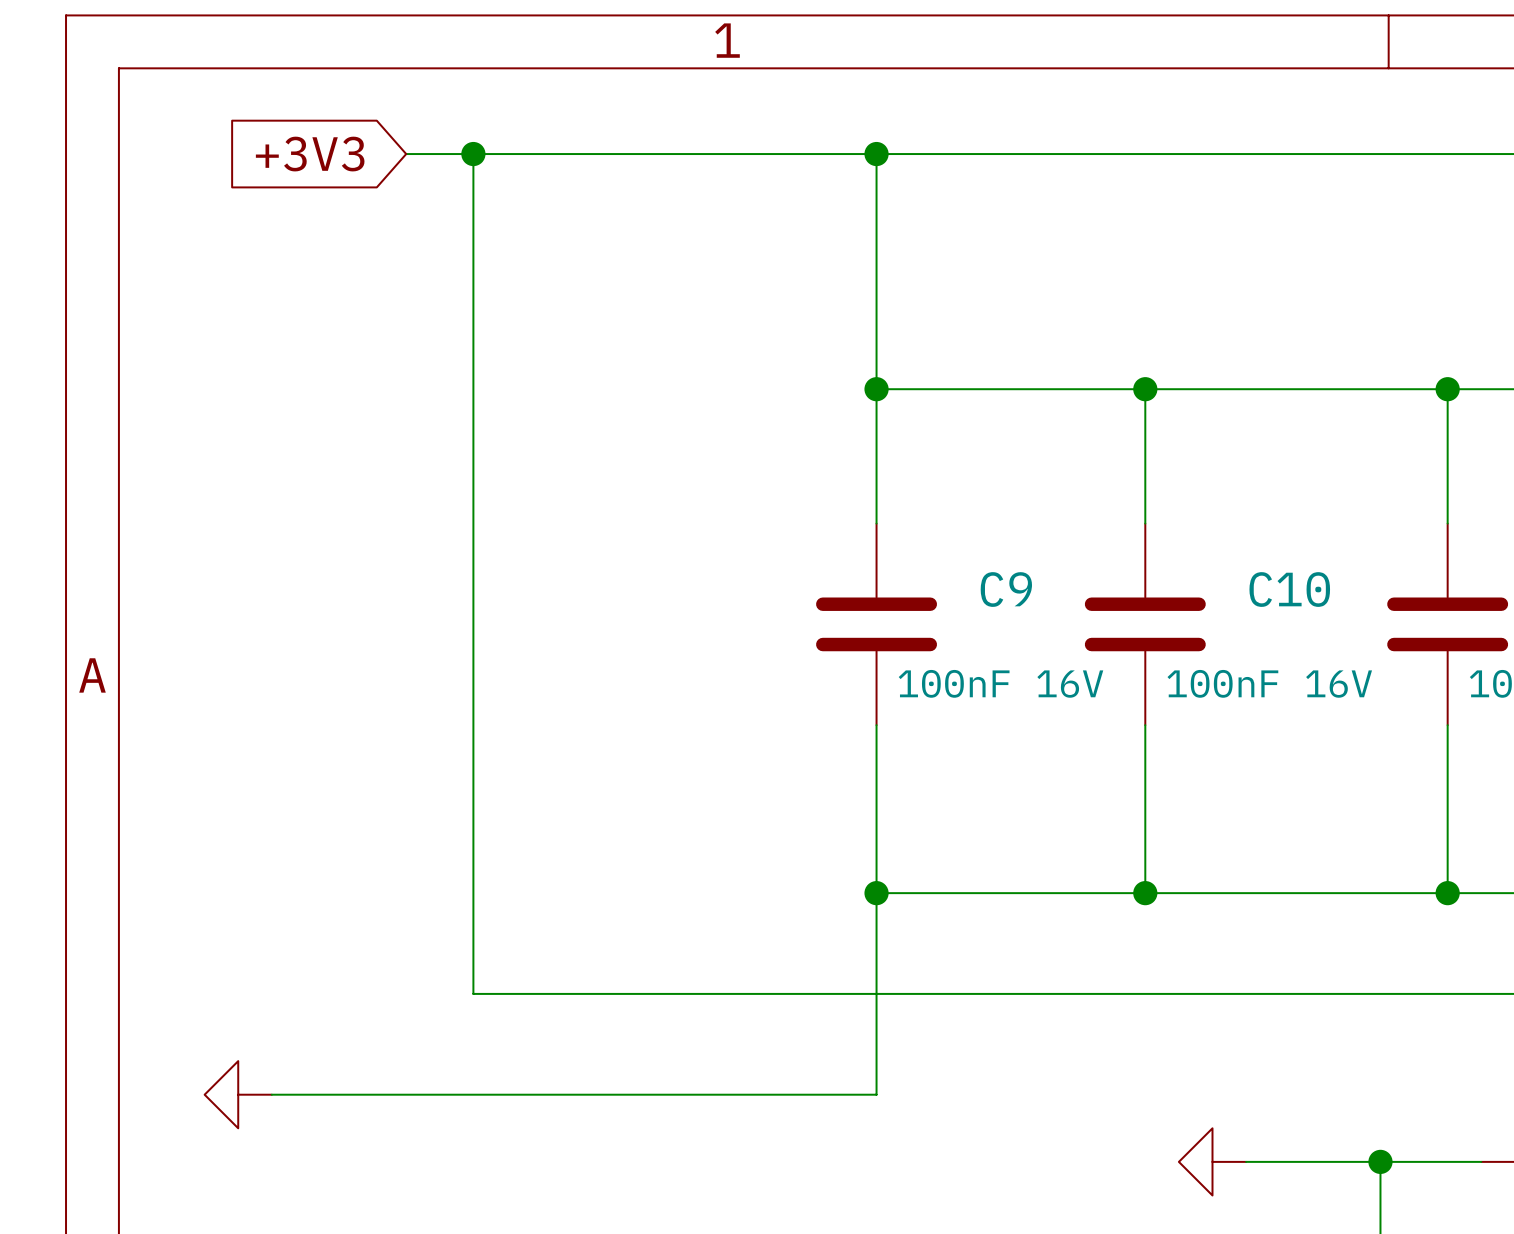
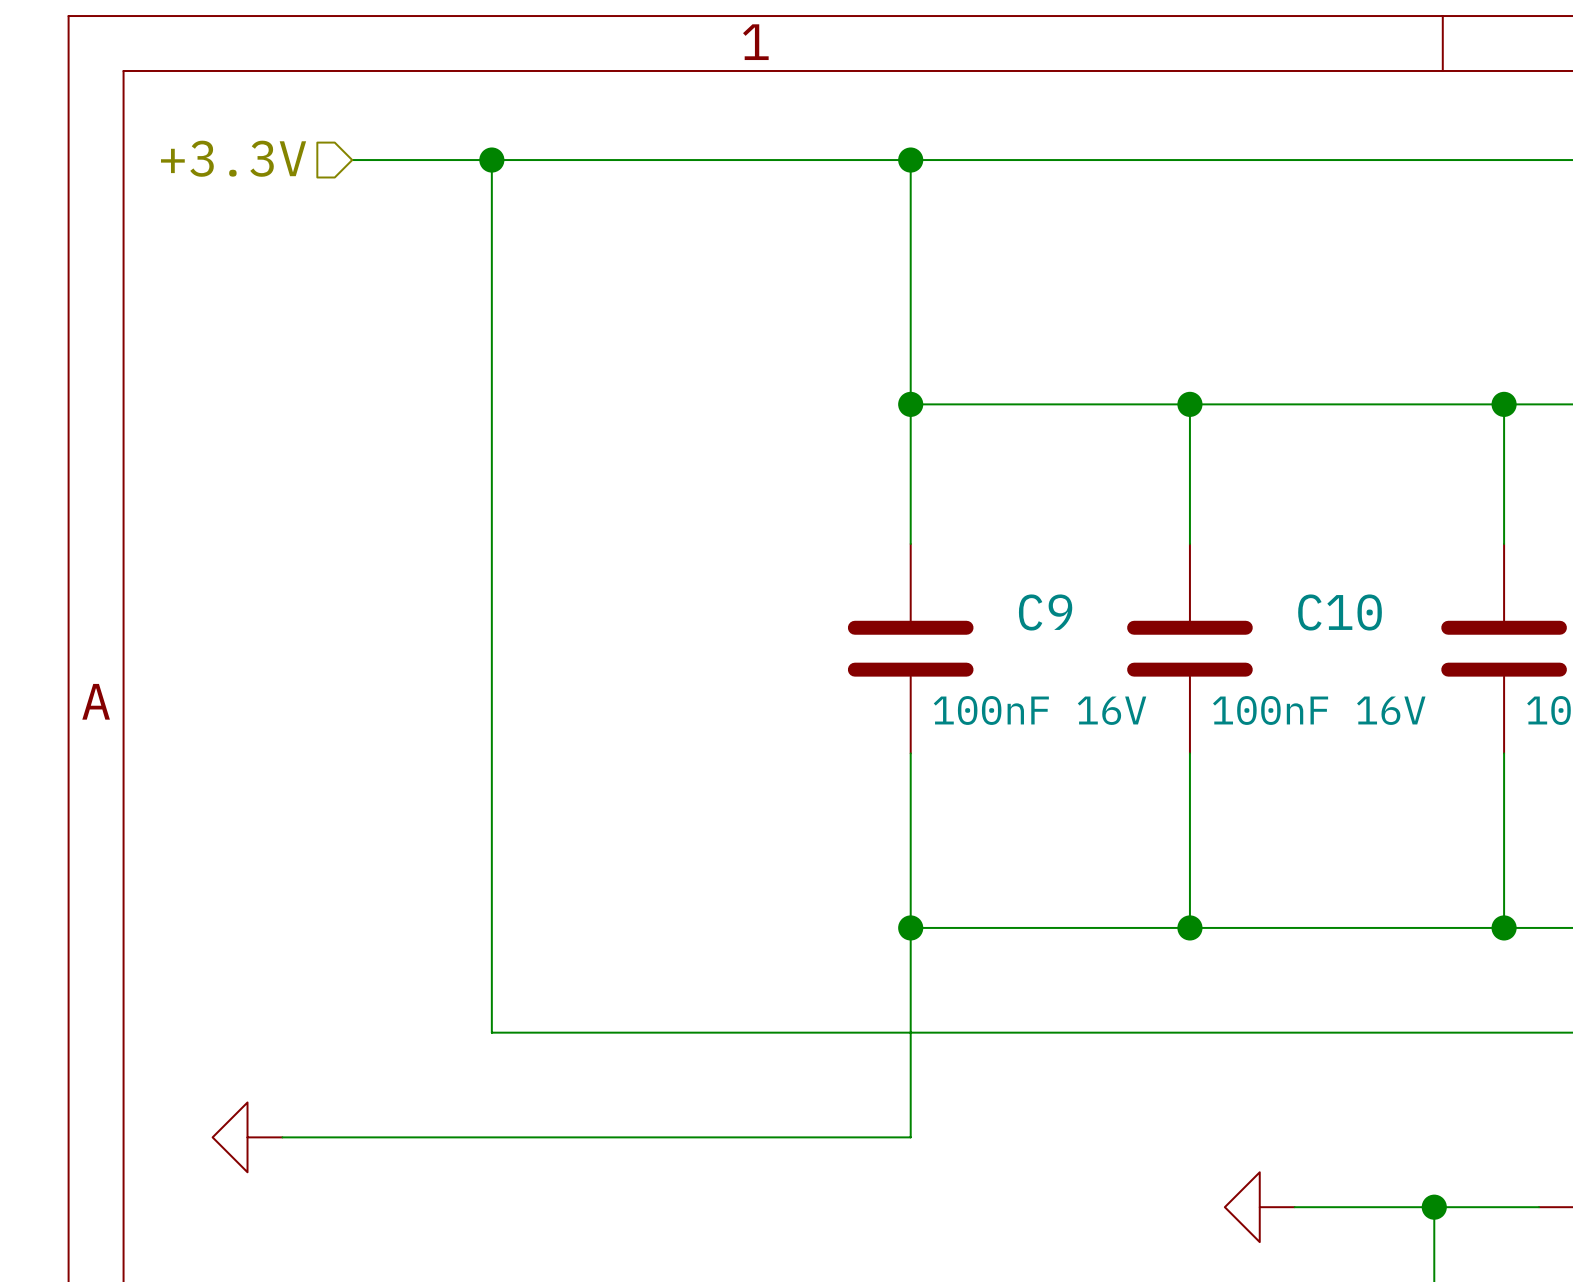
hierarchical label: none -> +3.3V (233, 158)
global label: +3V3 (310, 154) -> none
wire: none -> (352, 160) (422, 160)

